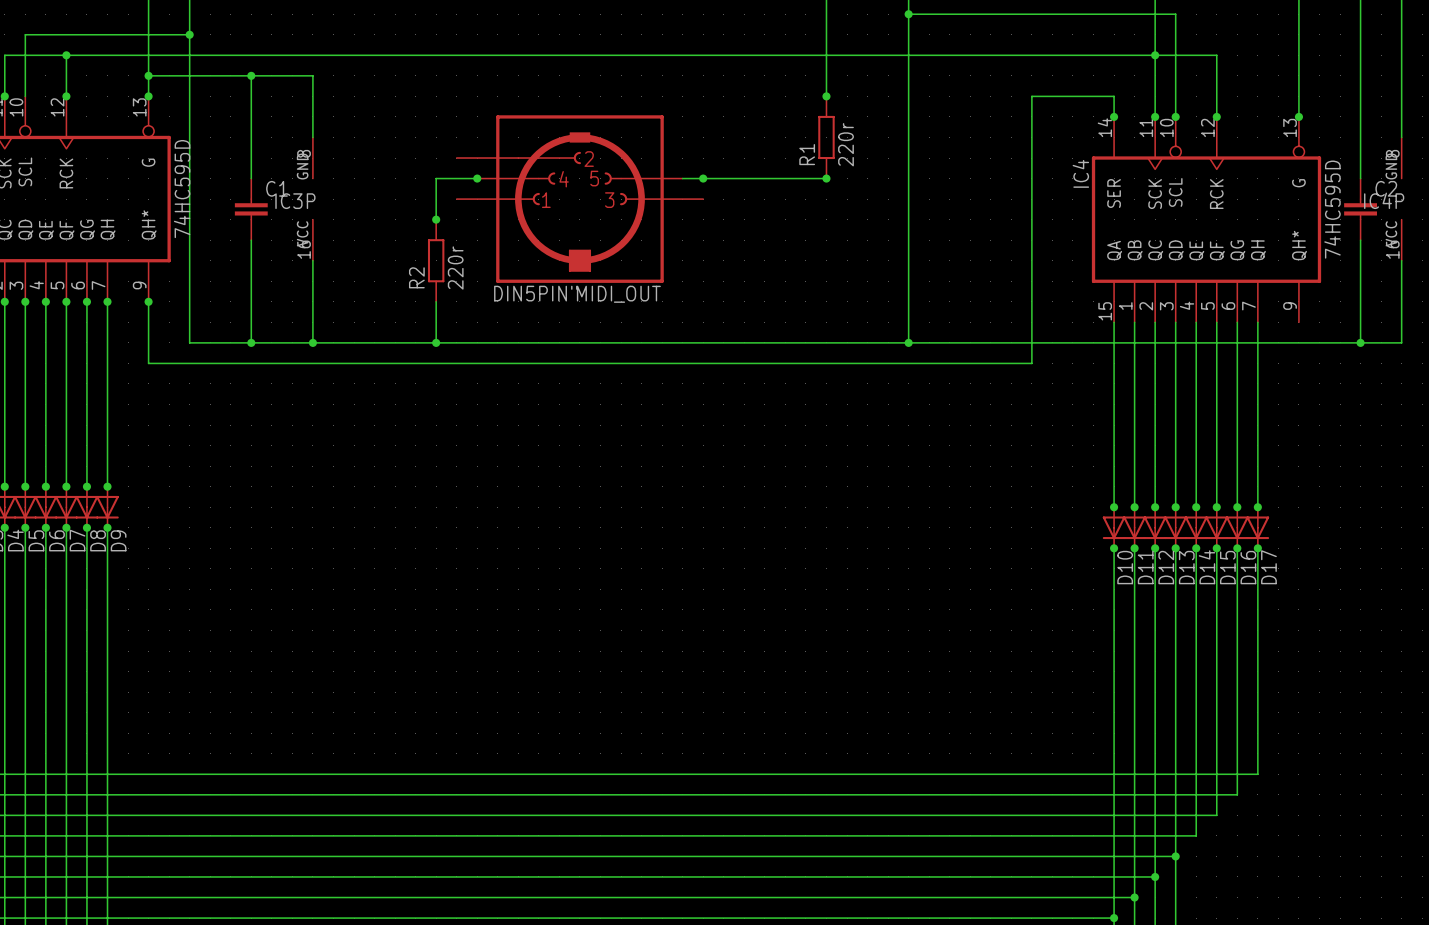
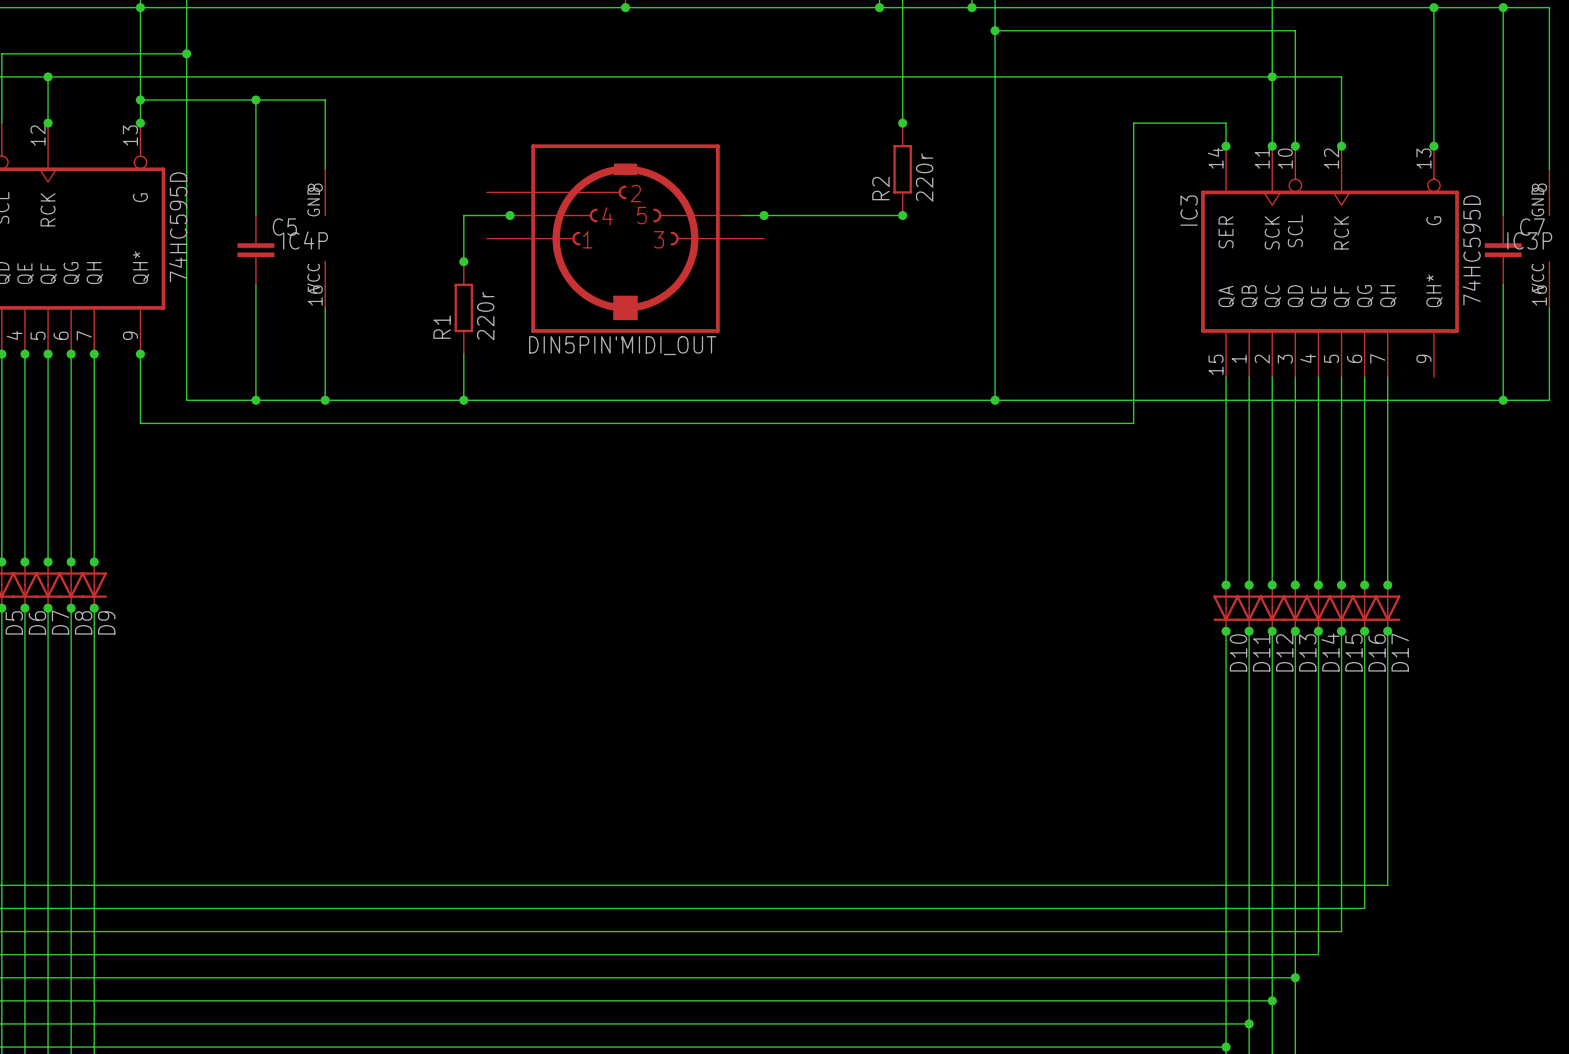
R1 name: R1 (807, 154) -> R2 (880, 188)
IC4 name: IC4 (1080, 173) -> IC3 (1189, 210)
C1 name: C1 (277, 188) -> C5 (284, 227)
C2 name: C2 (1386, 188) -> C7 (1532, 227)
IC4P name: IC4P (1384, 200) -> IC3P (1529, 240)
IC3P name: IC3P (295, 201) -> IC4P (305, 240)
R2 name: R2 (416, 277) -> R1 (442, 327)

